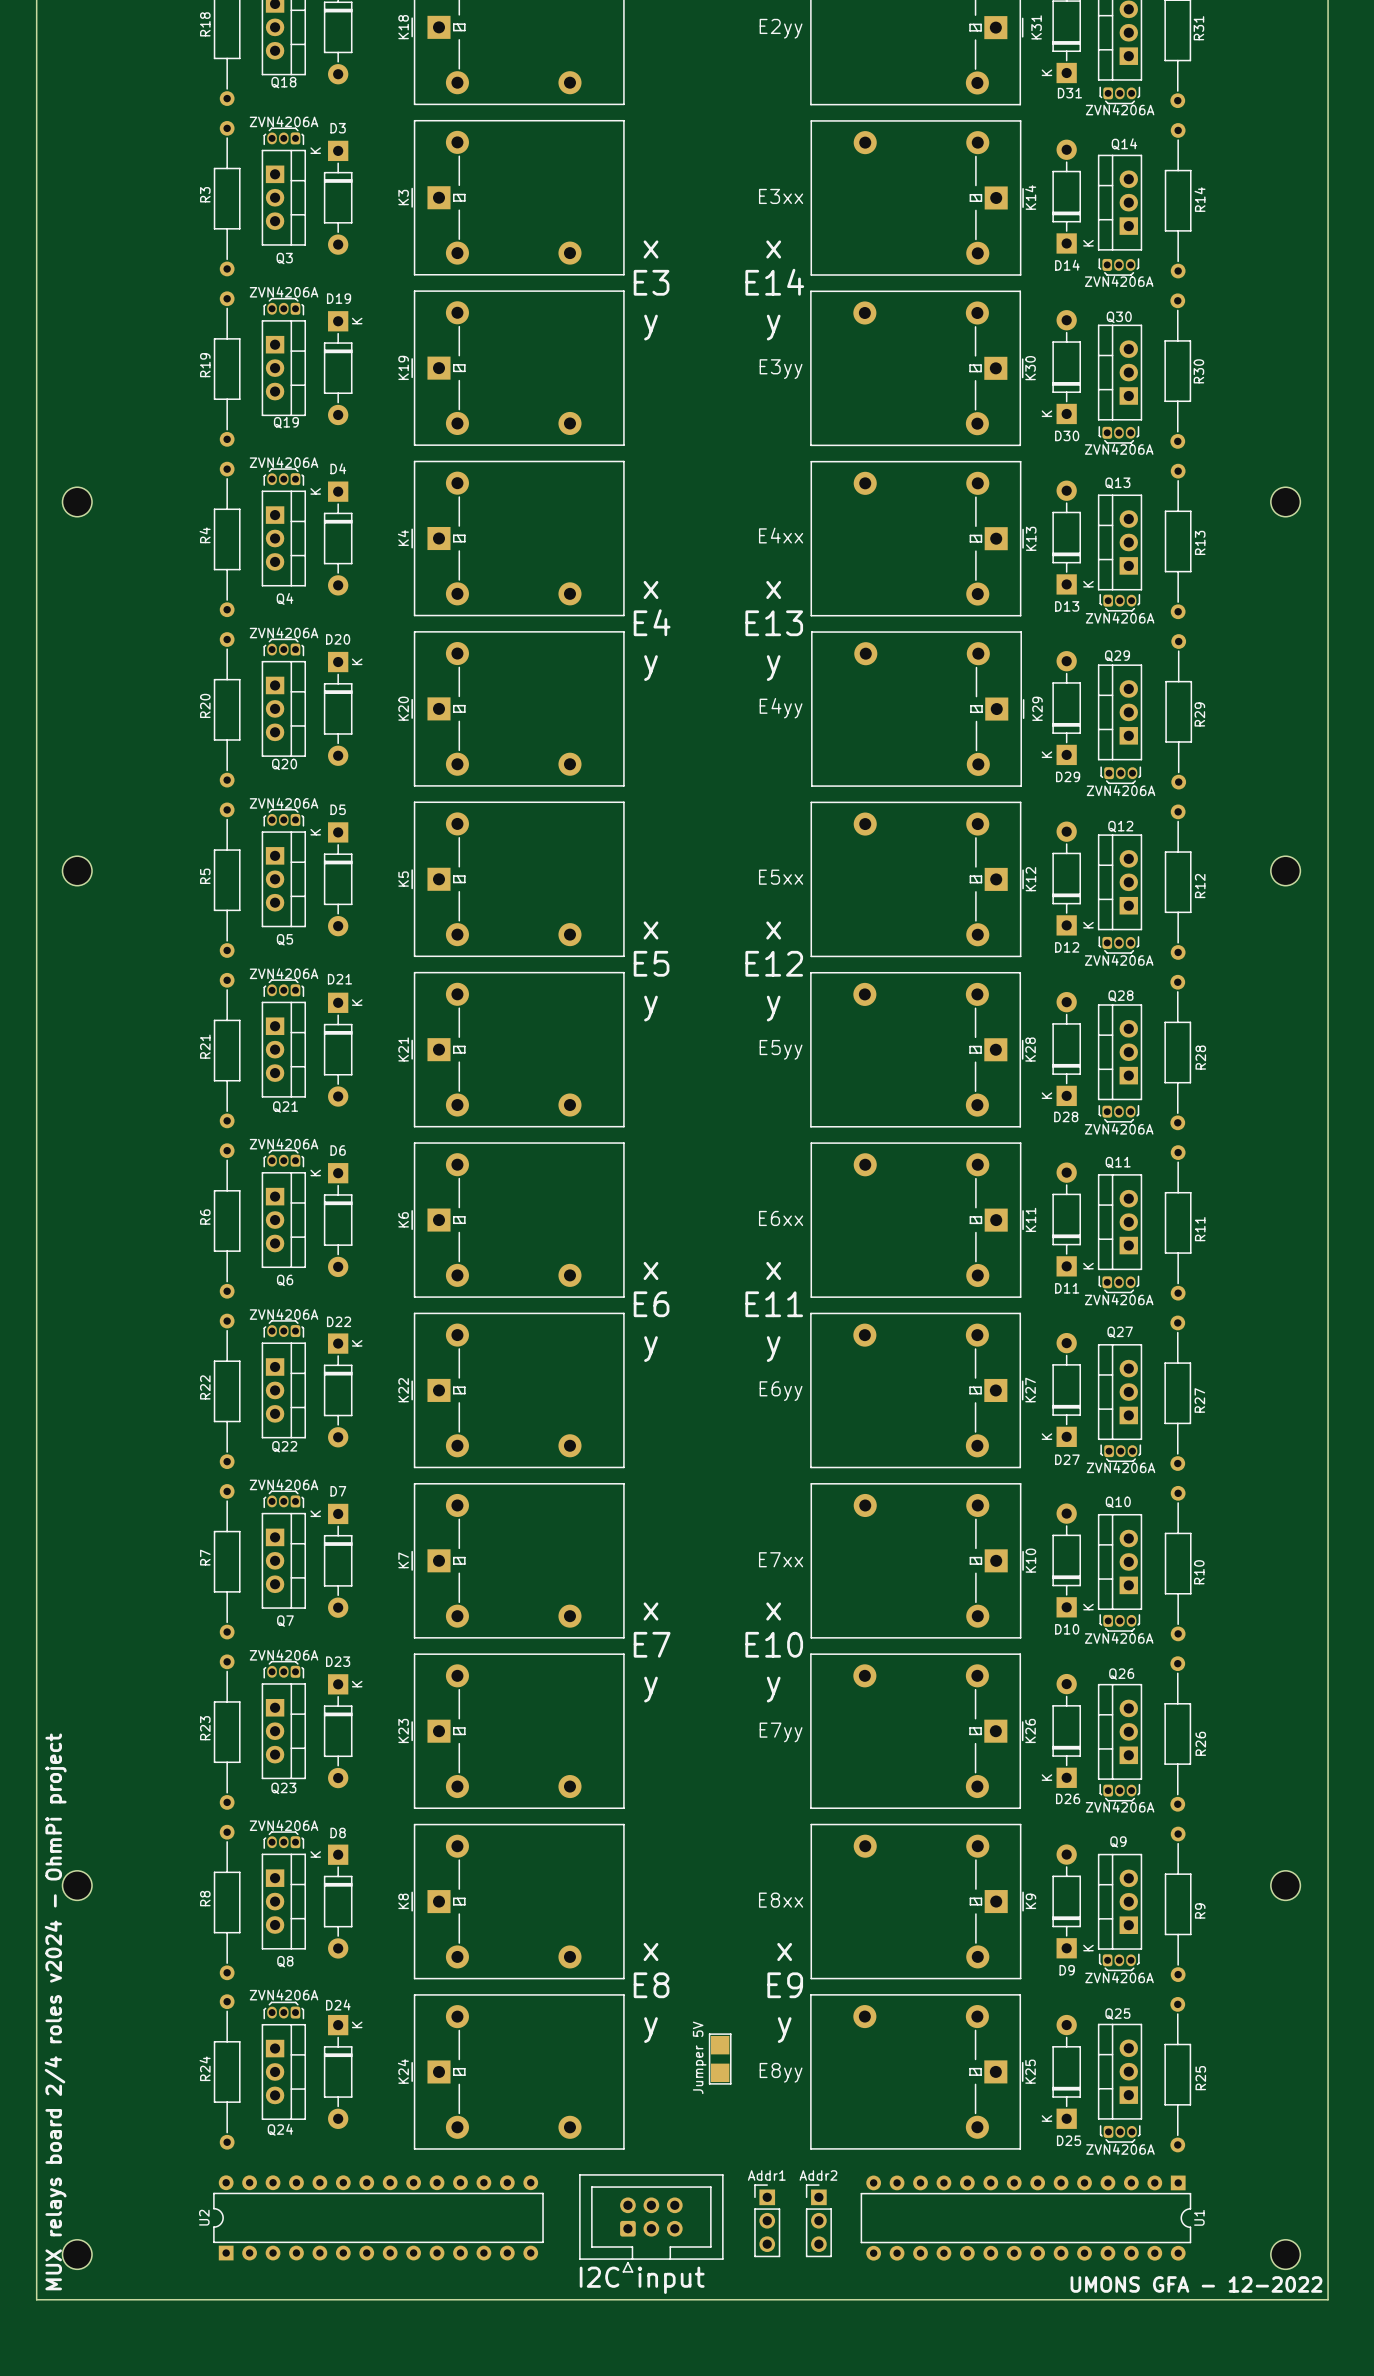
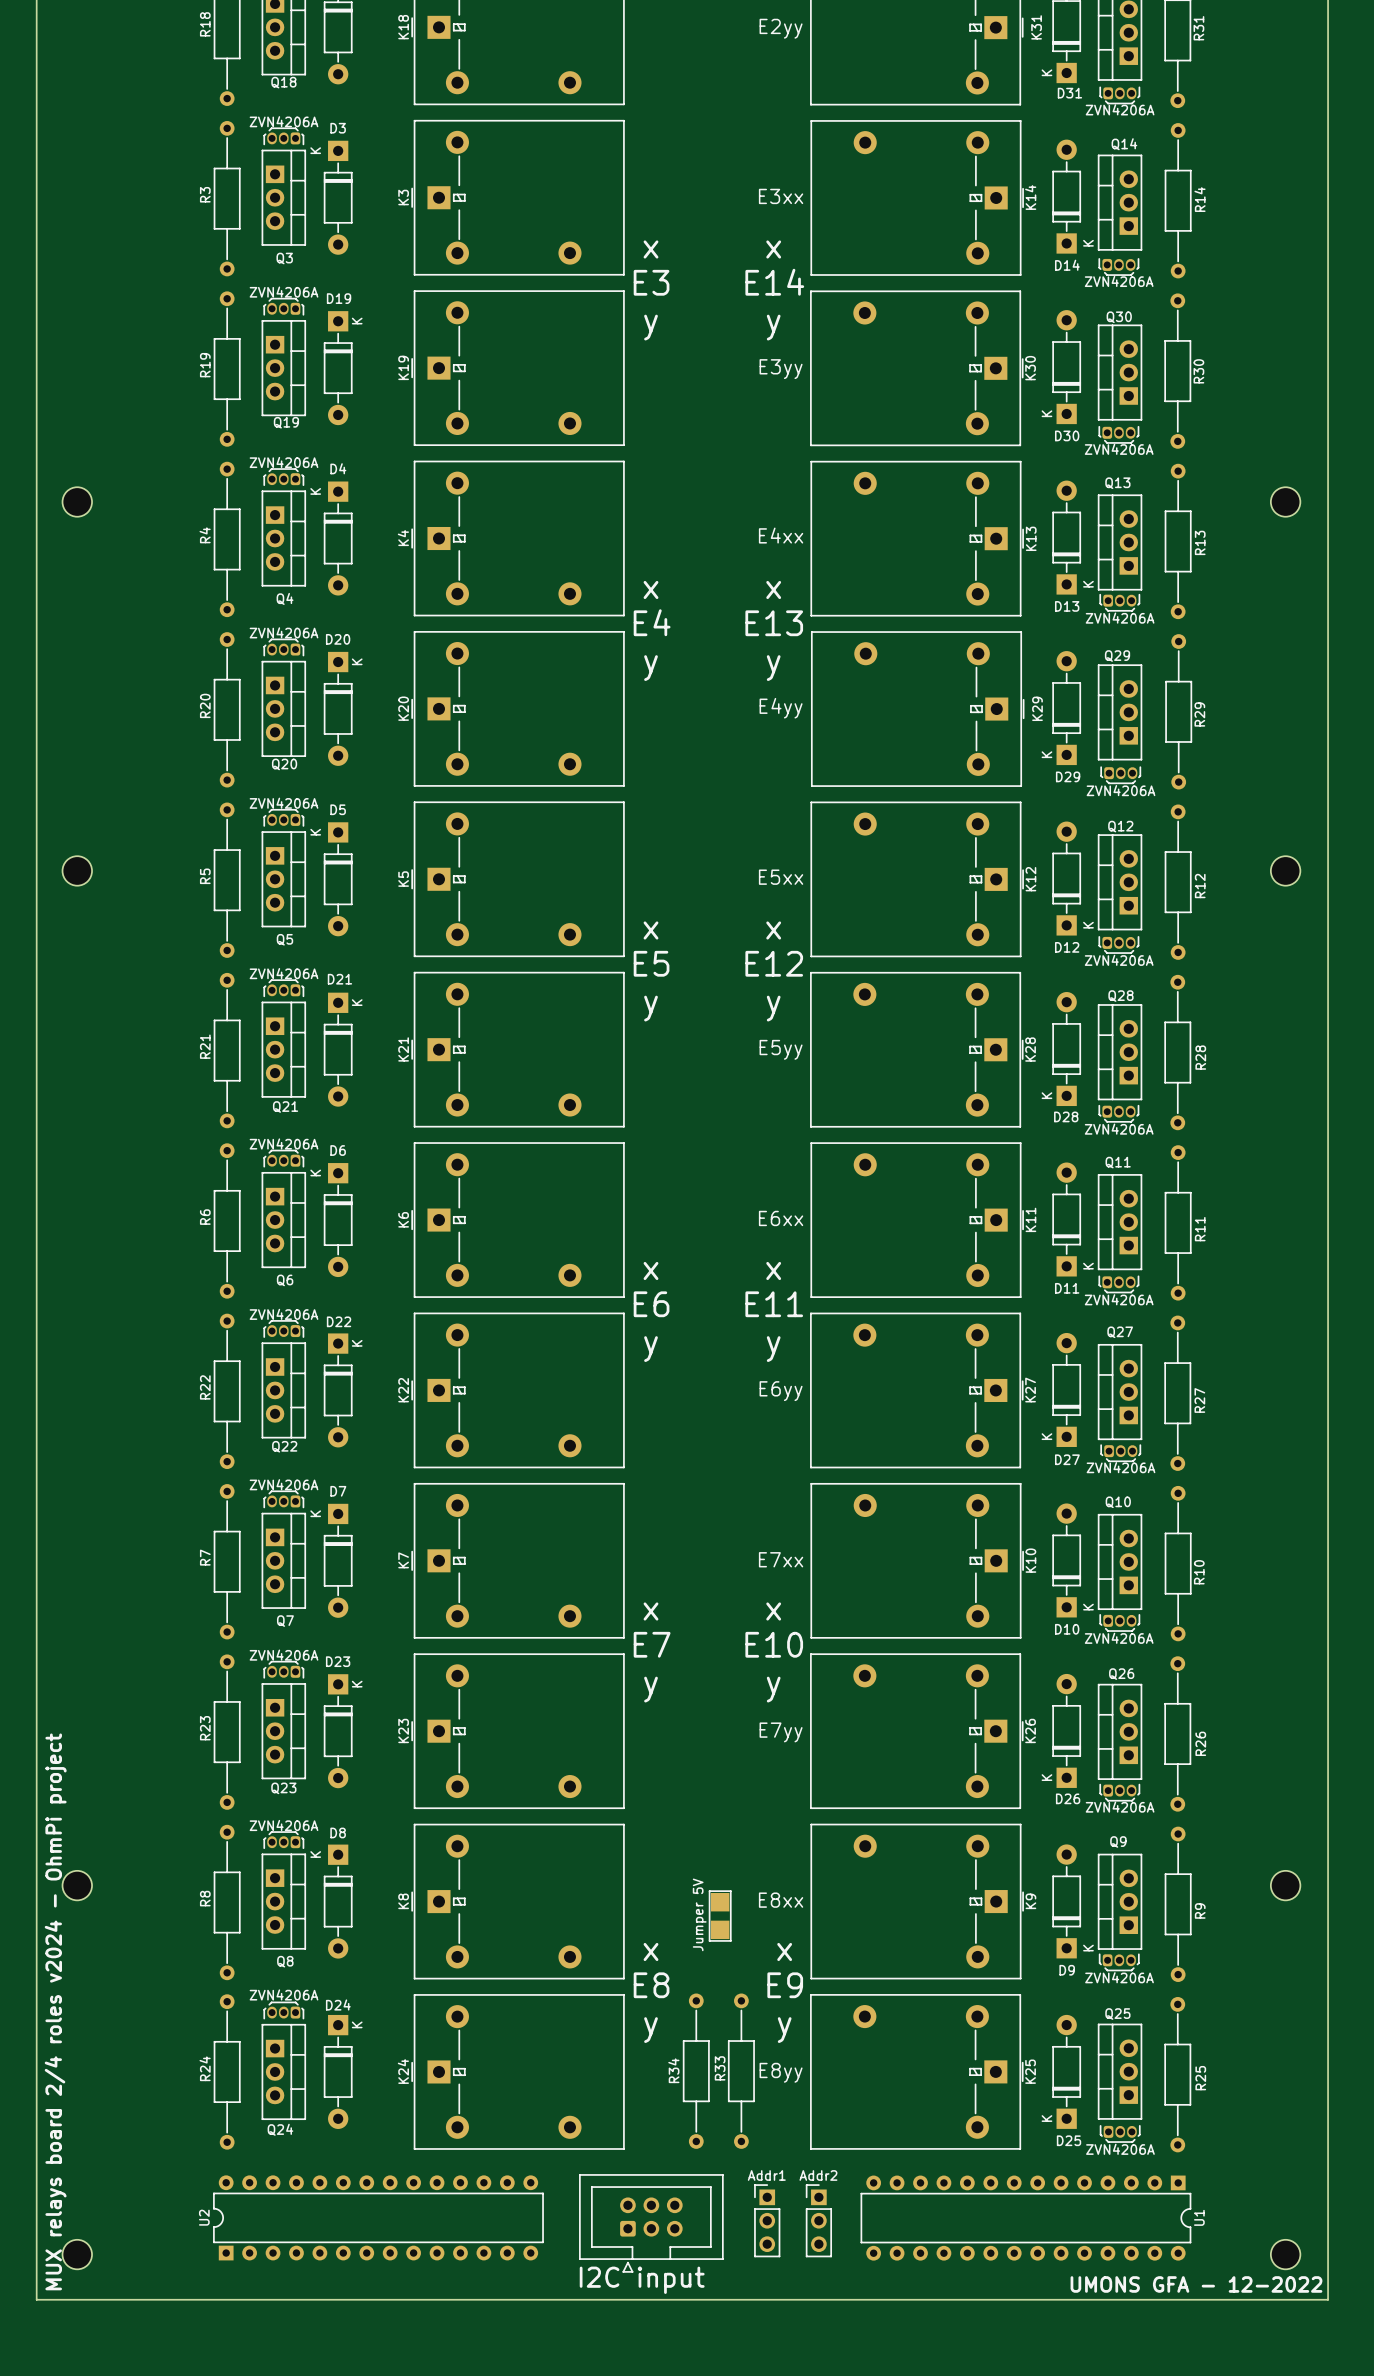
Jumper 5V position: (720, 2059) -> (720, 1916)
R34: none -> (696, 2071)
R33: none -> (741, 2071)

